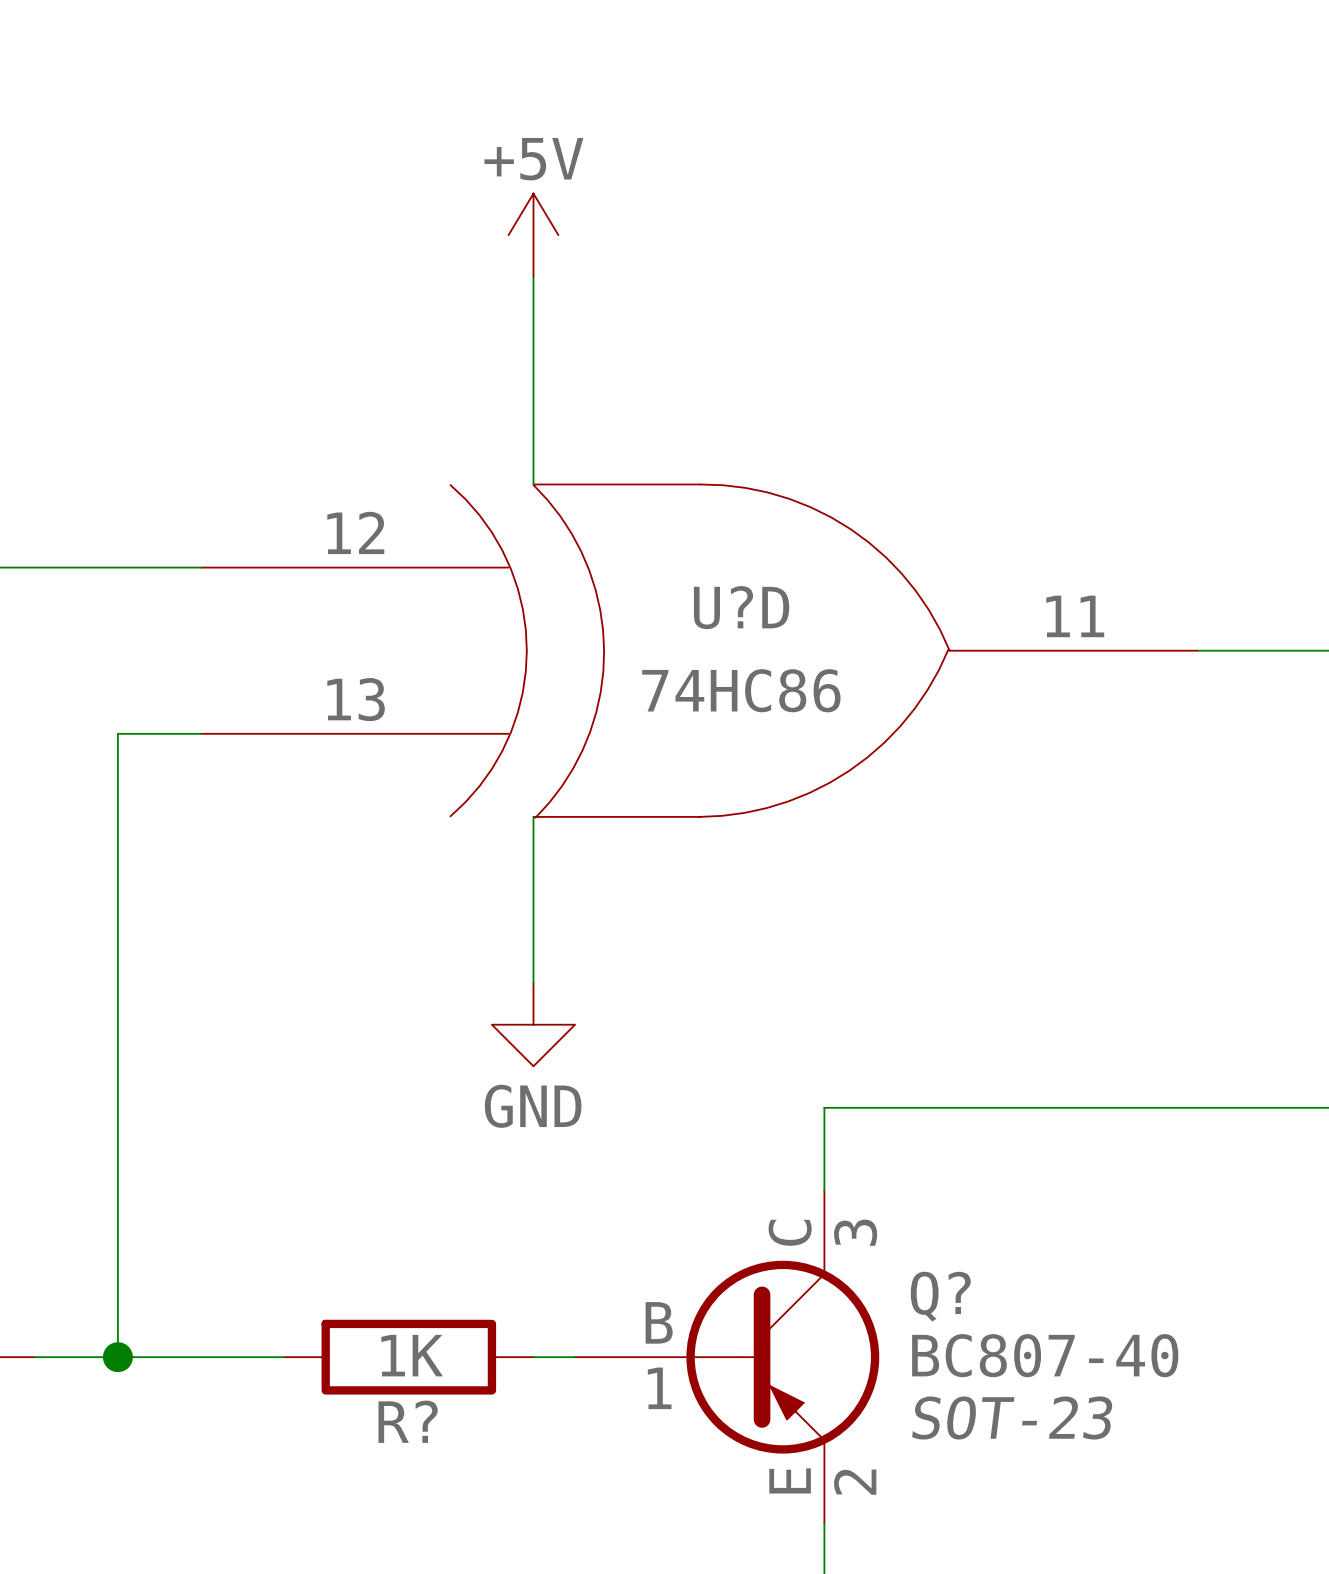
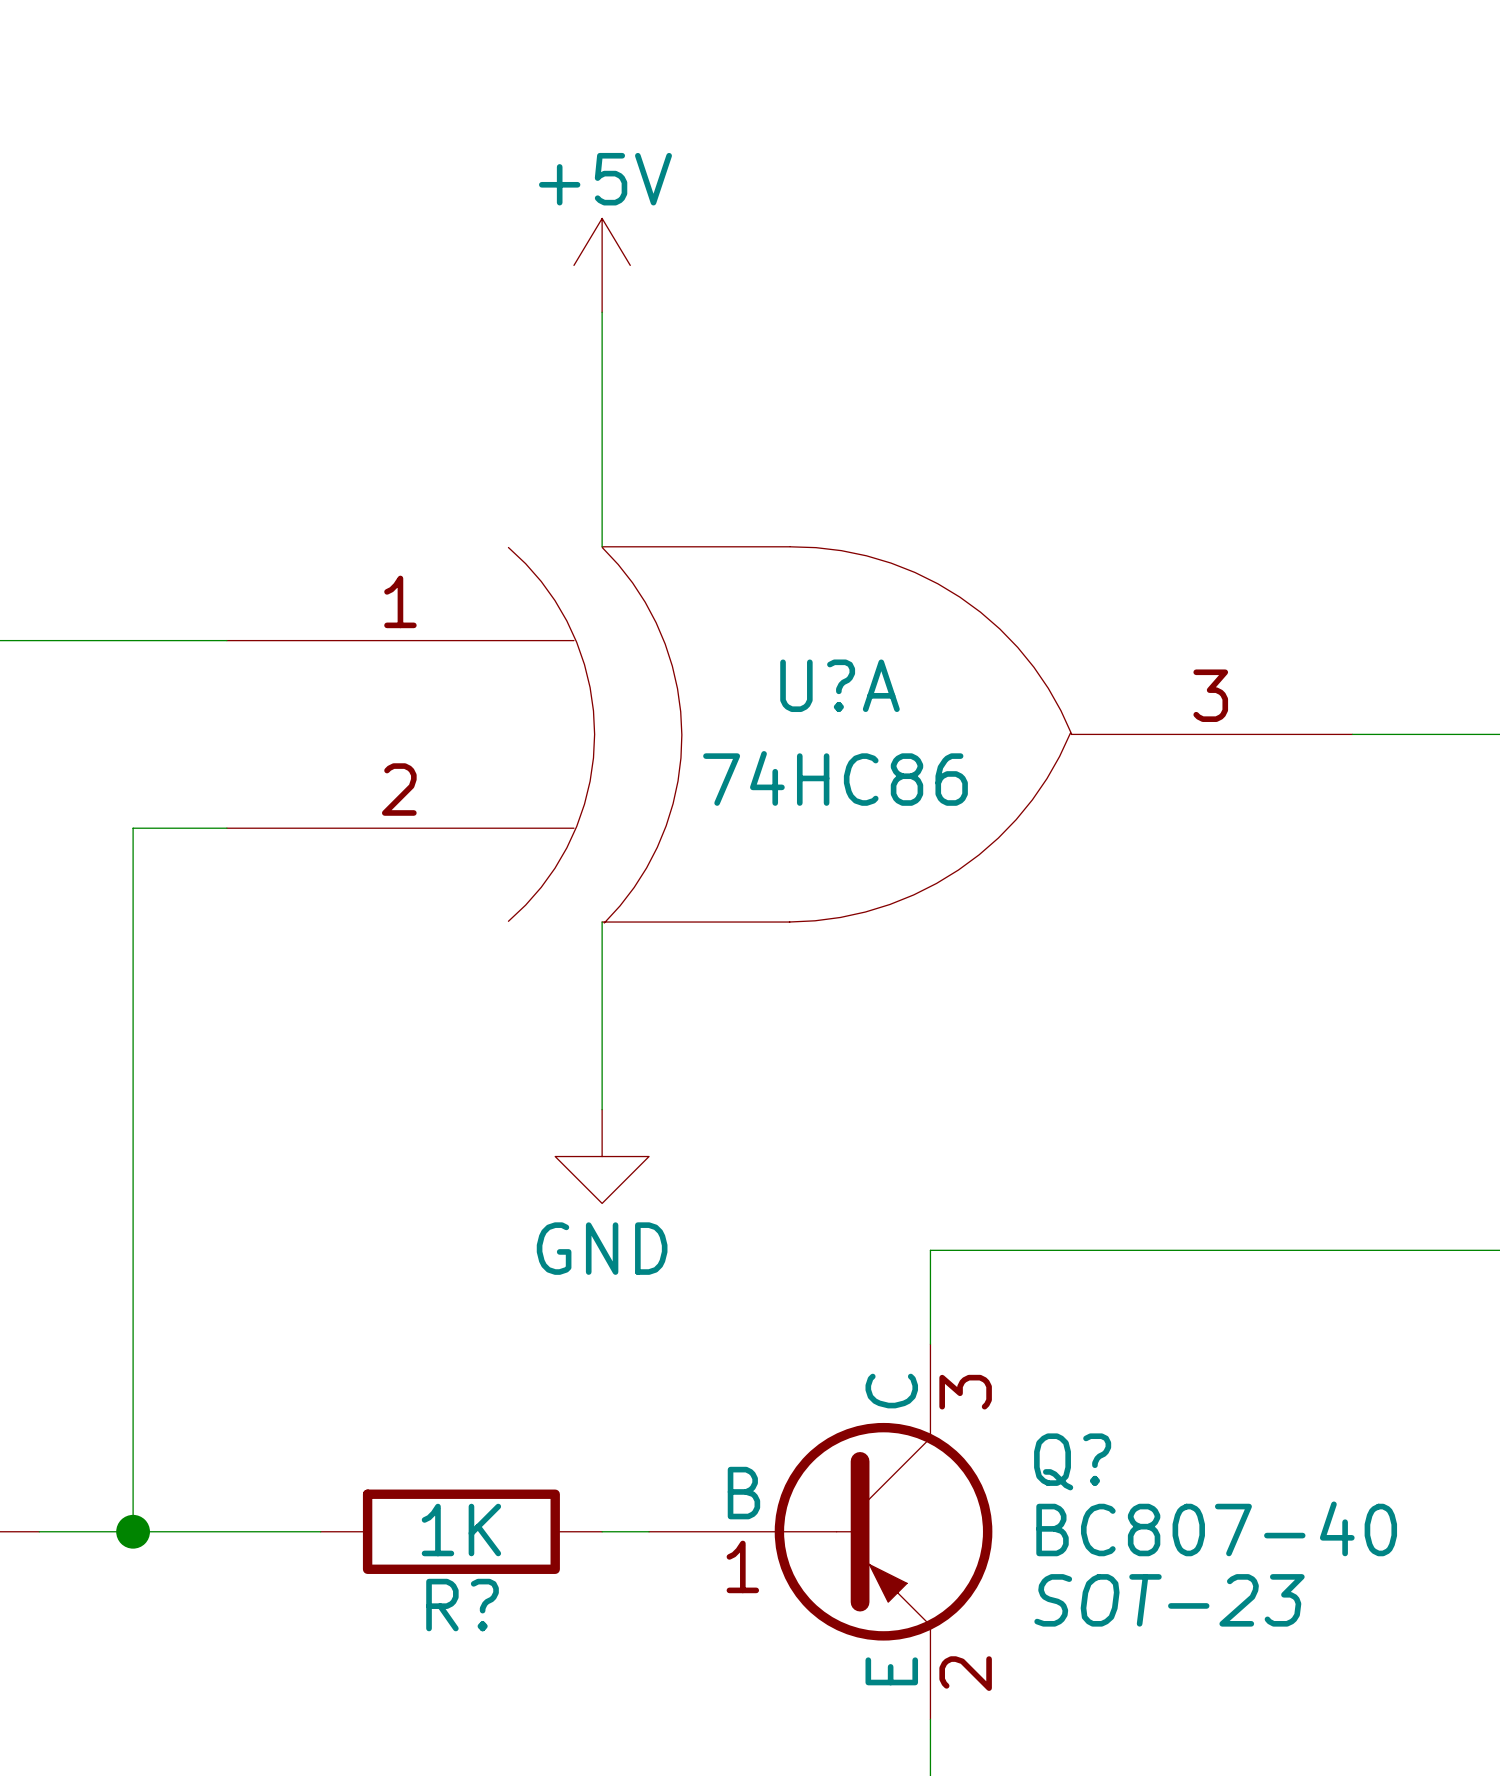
U?D pin number: 12 (355, 532) -> 1 (400, 601)
U?D name: U?D (741, 607) -> U?A (839, 685)
U?D pin number: 11 (1075, 616) -> 3 (1210, 695)
U?D pin number: 13 (356, 699) -> 2 (399, 789)

